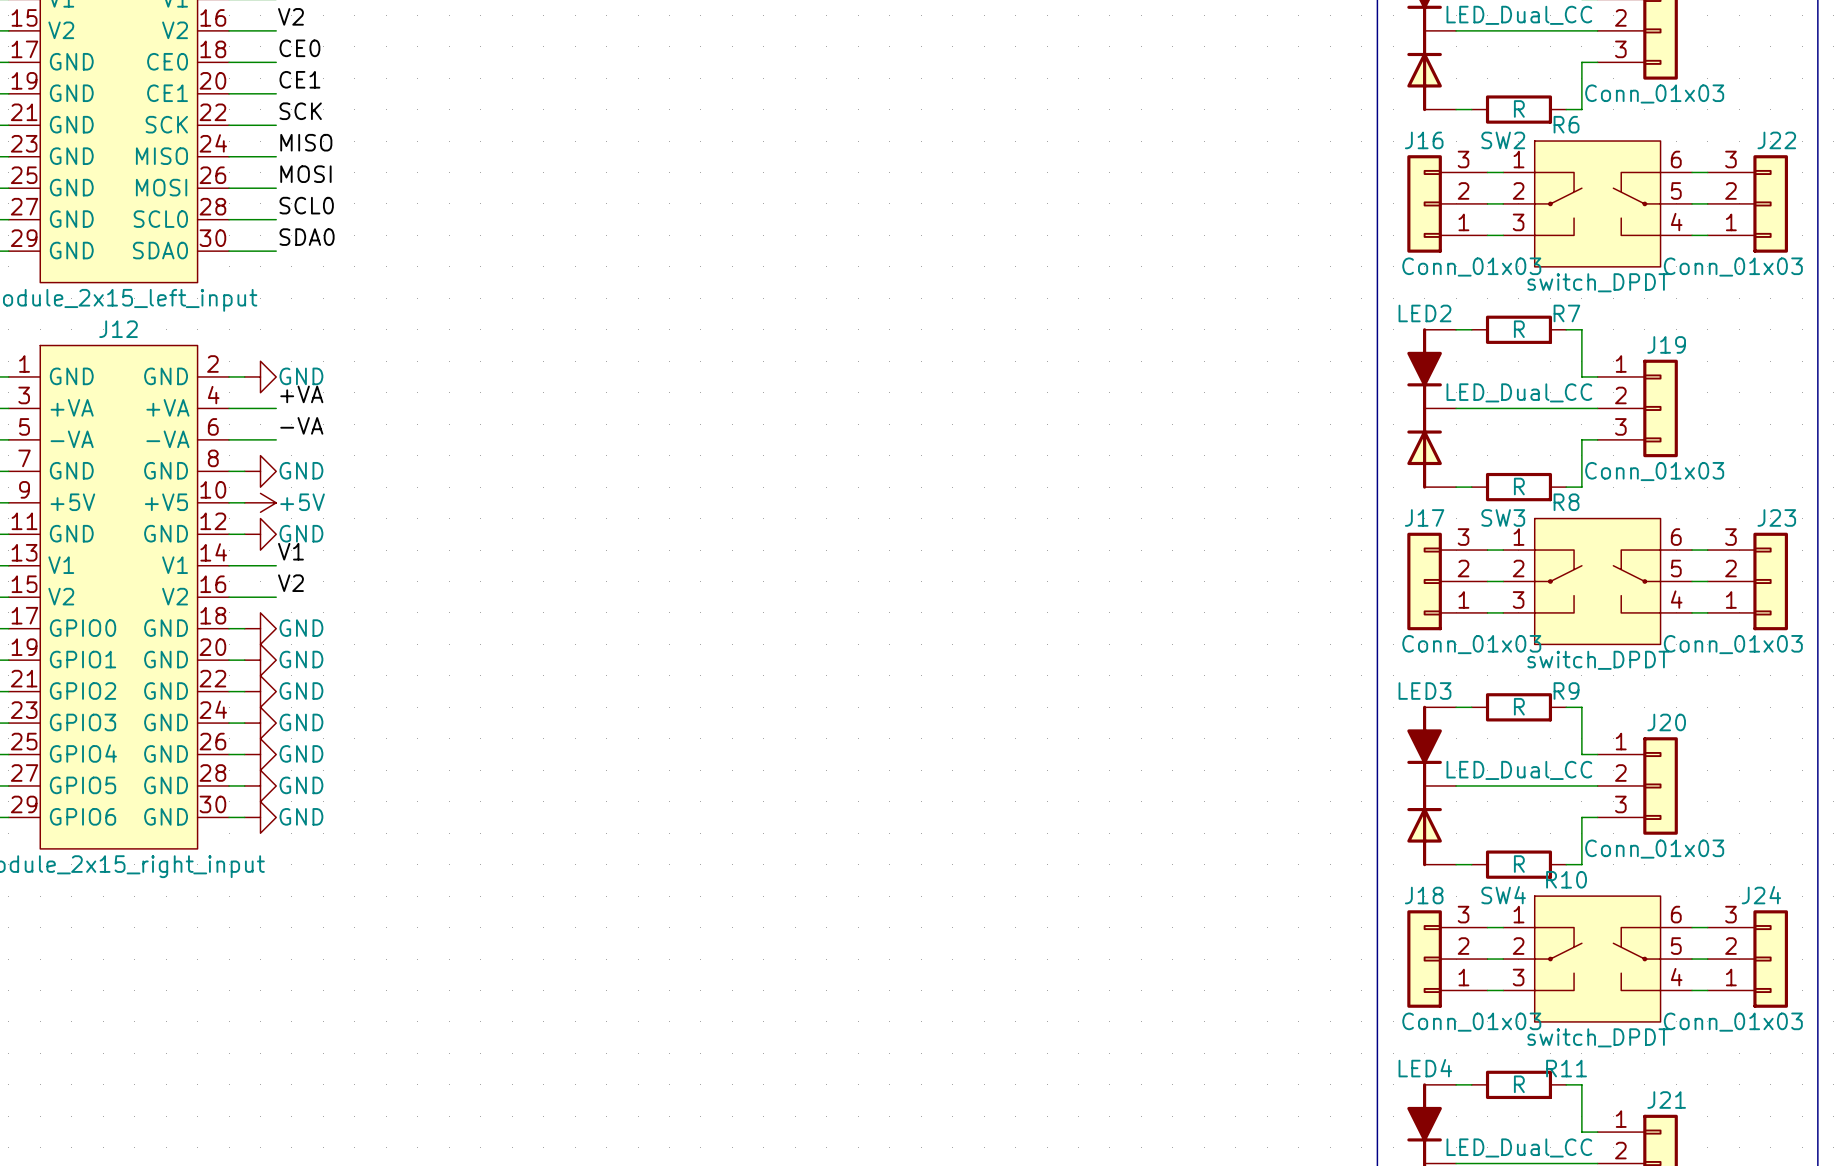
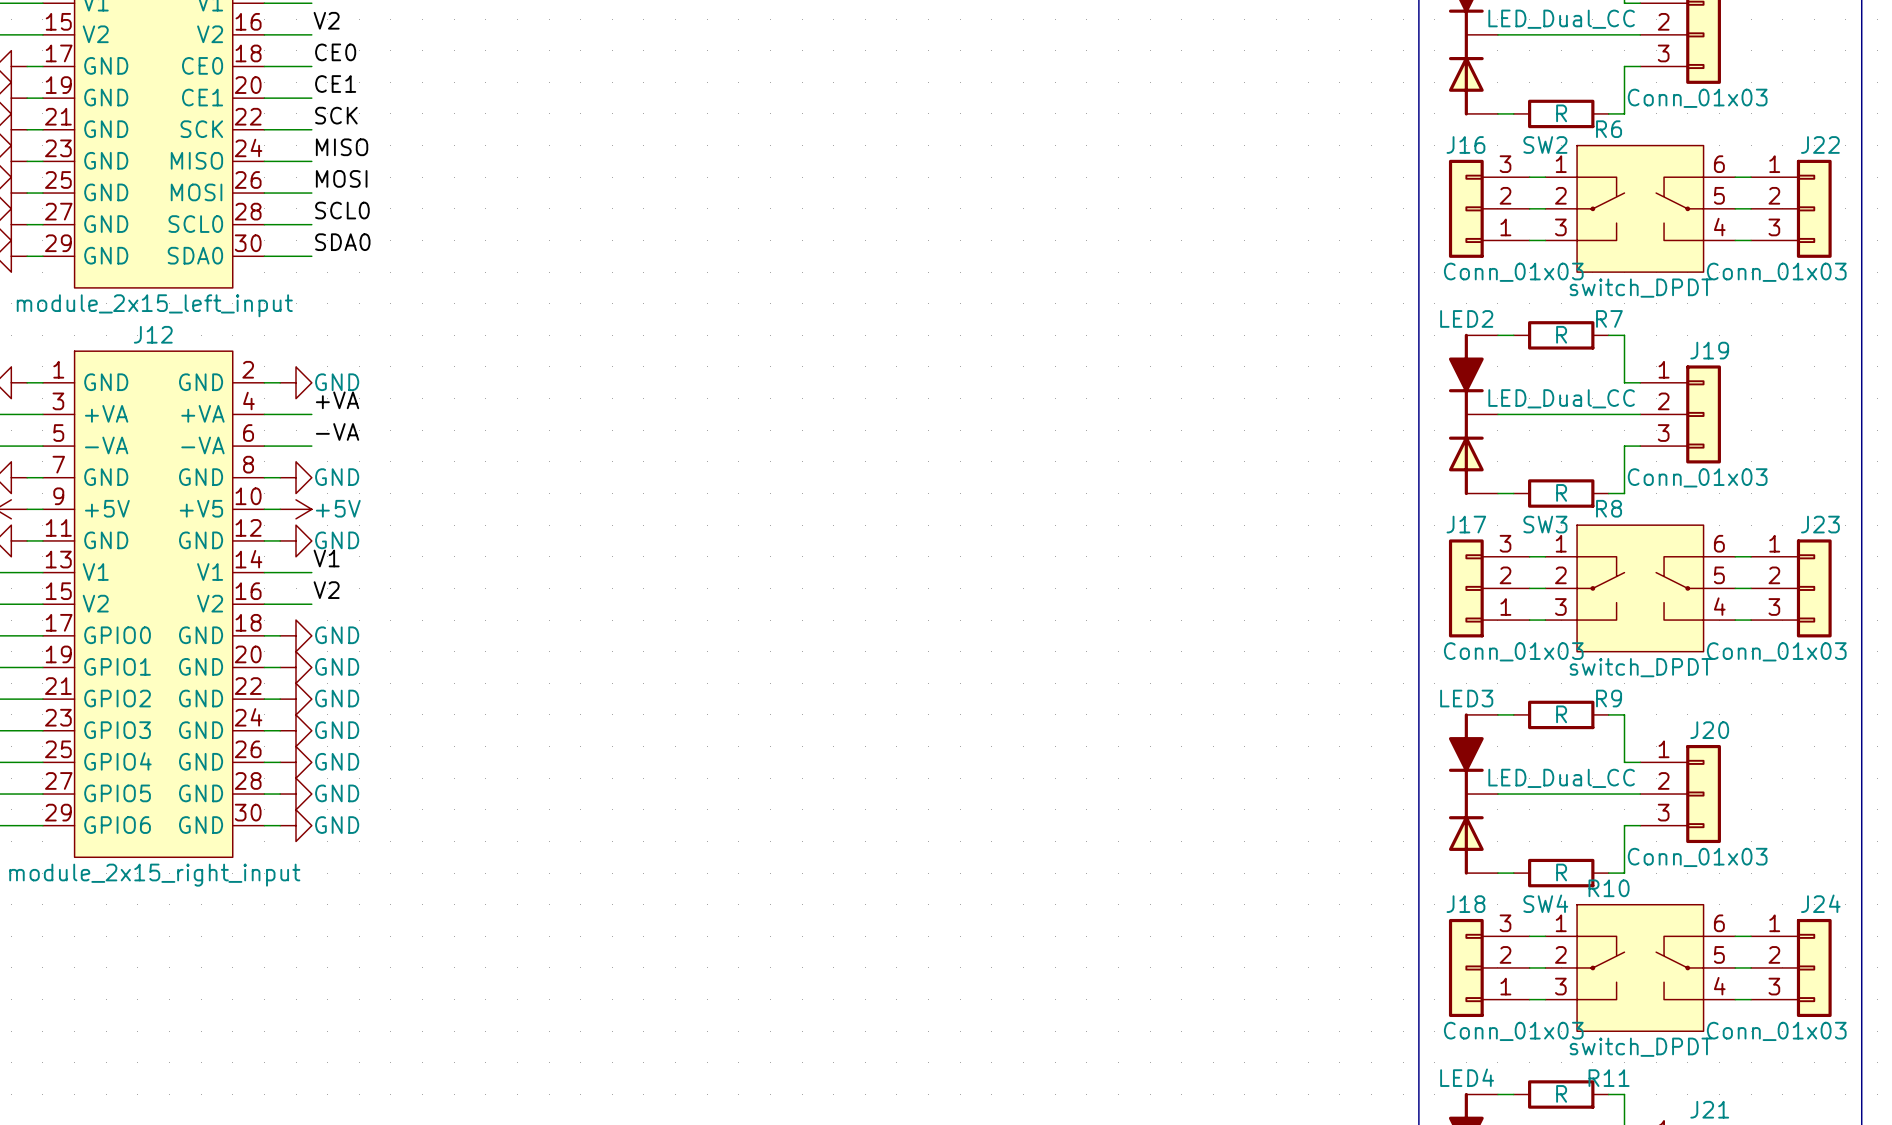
J22 flip: as is (1770, 203) -> up-down (1814, 208)
J23 flip: as is (1770, 581) -> up-down (1814, 588)
J24 flip: as is (1770, 959) -> up-down (1814, 967)

